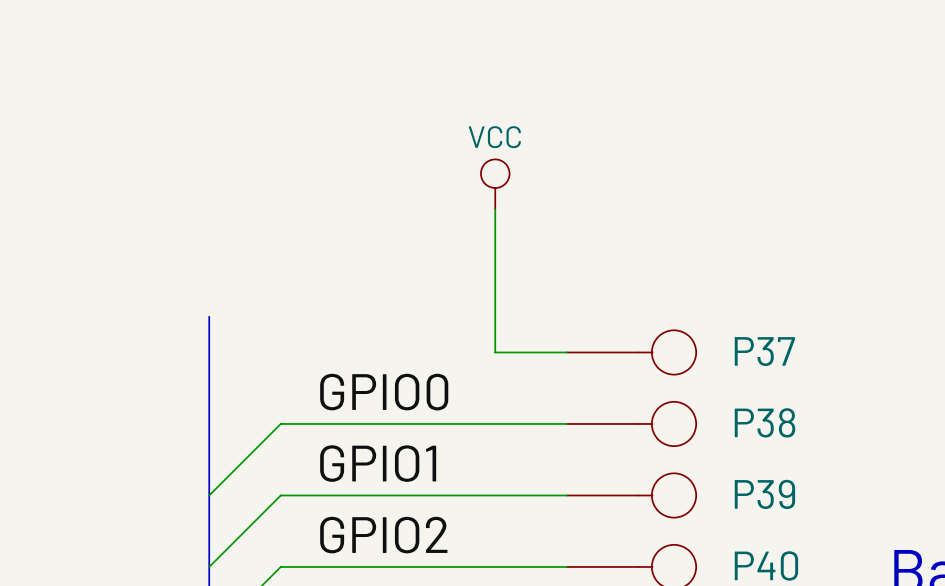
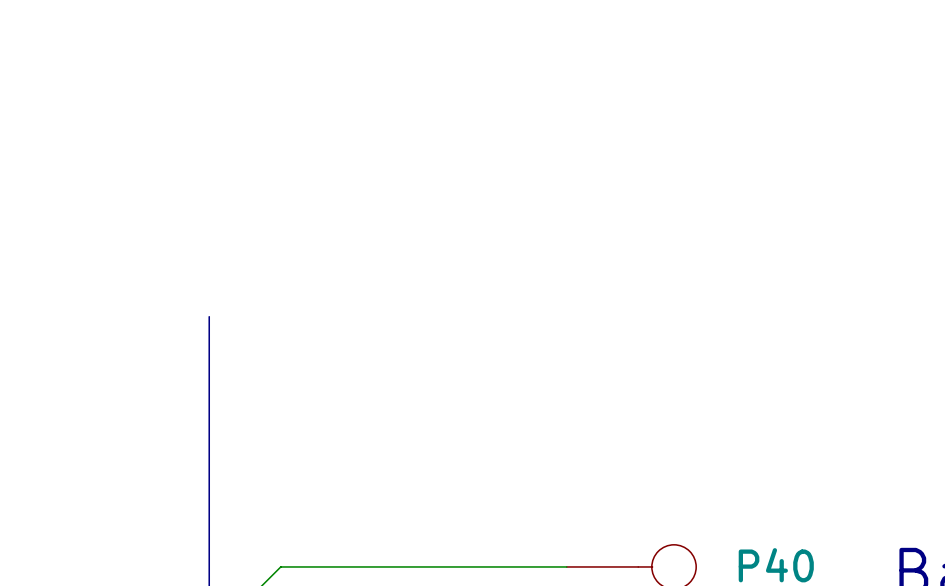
power symbol: VCC (495, 184) -> none
wire: (495, 209) (495, 352) (566, 352) -> none
P37: (631, 352) -> none
label: GPIO0 (384, 392) -> none
wire: (566, 423) (280, 423) (209, 495) -> none
P38: (631, 423) -> none
label: GPIO1 (378, 463) -> none
wire: (566, 495) (280, 495) (209, 566) -> none
P39: (631, 495) -> none
label: GPIO2 (383, 535) -> none

